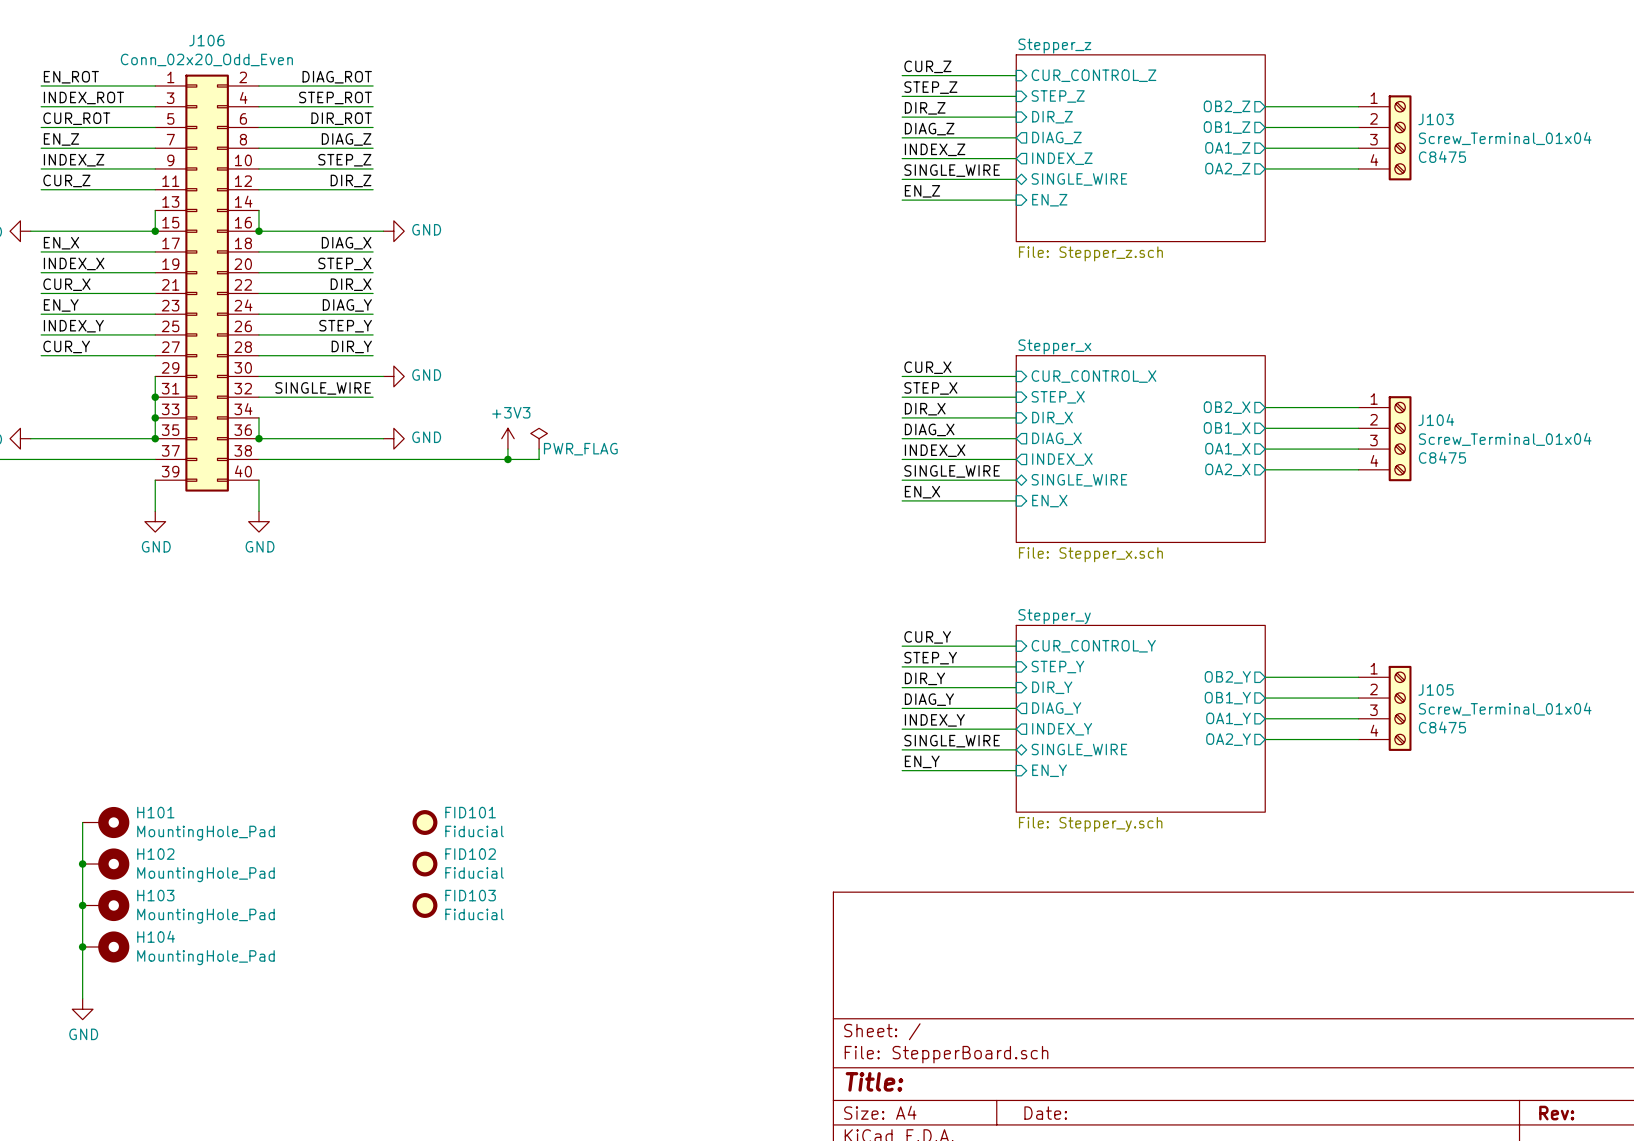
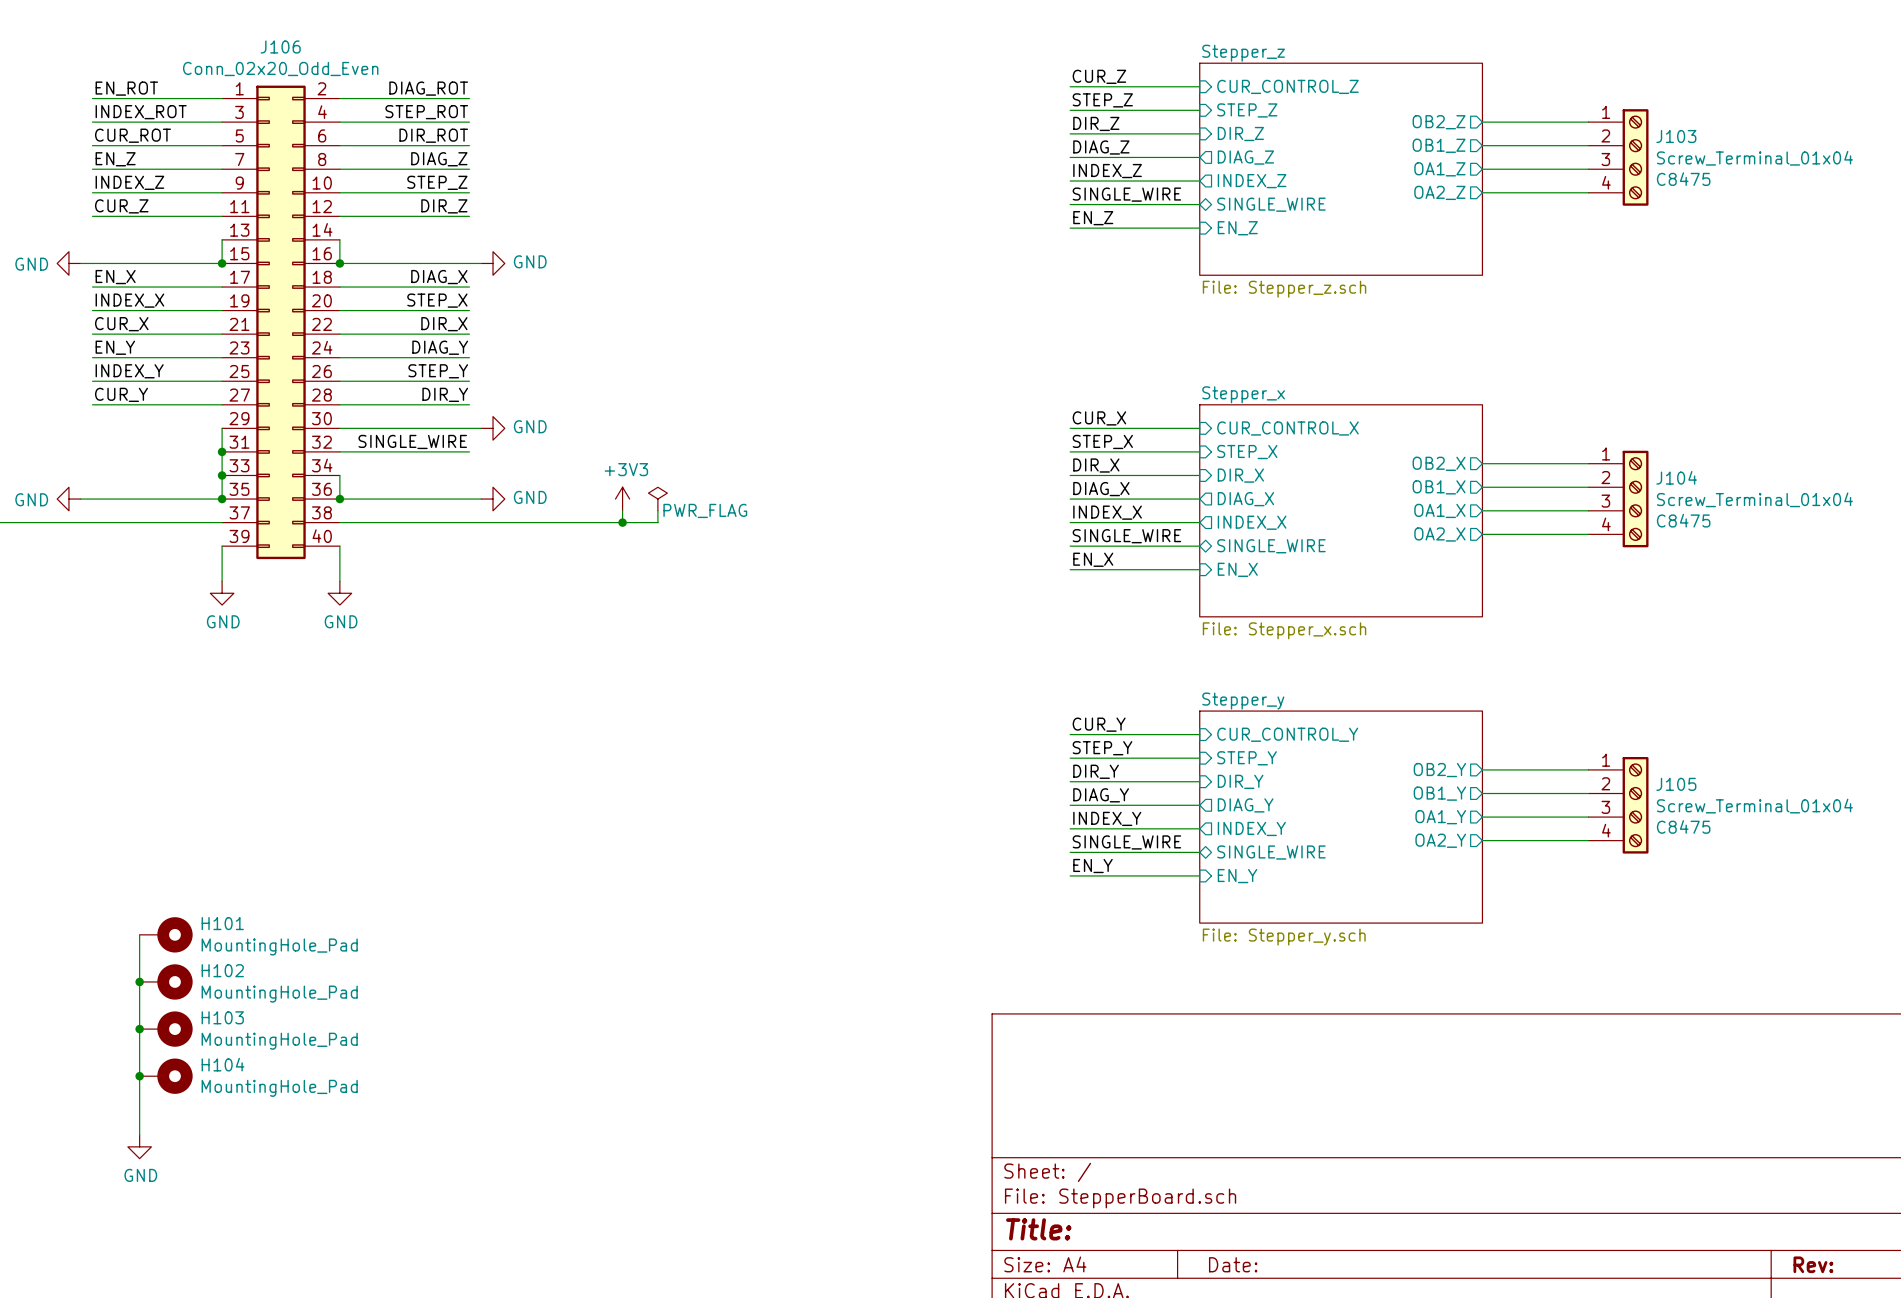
FID101: Fiducial (424, 822) -> none
FID102: Fiducial (424, 864) -> none
FID103: Fiducial (424, 905) -> none

